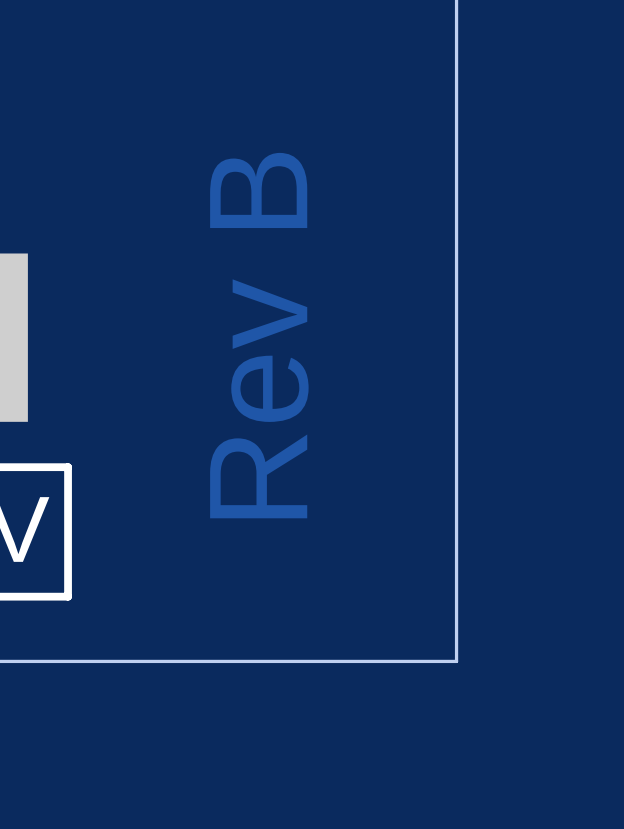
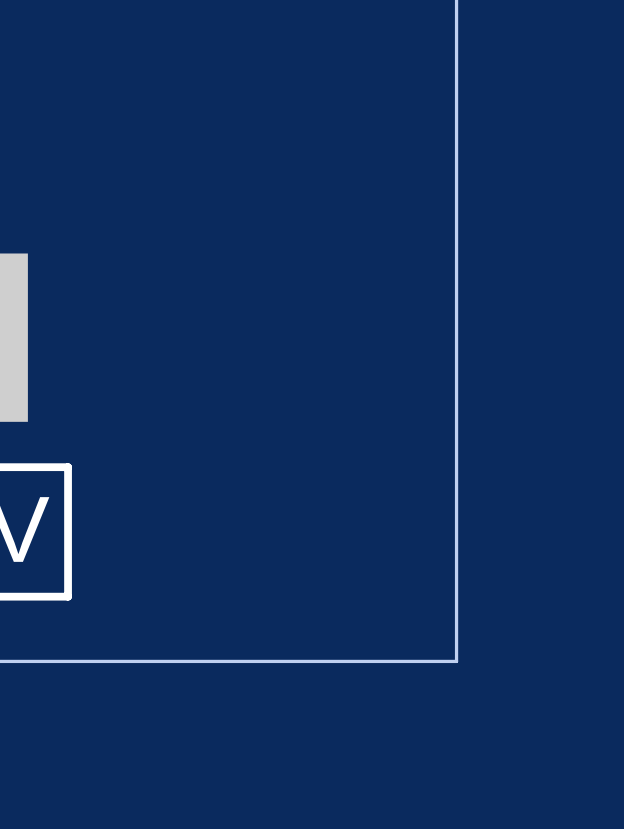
text: Rev B (259, 335) -> none

